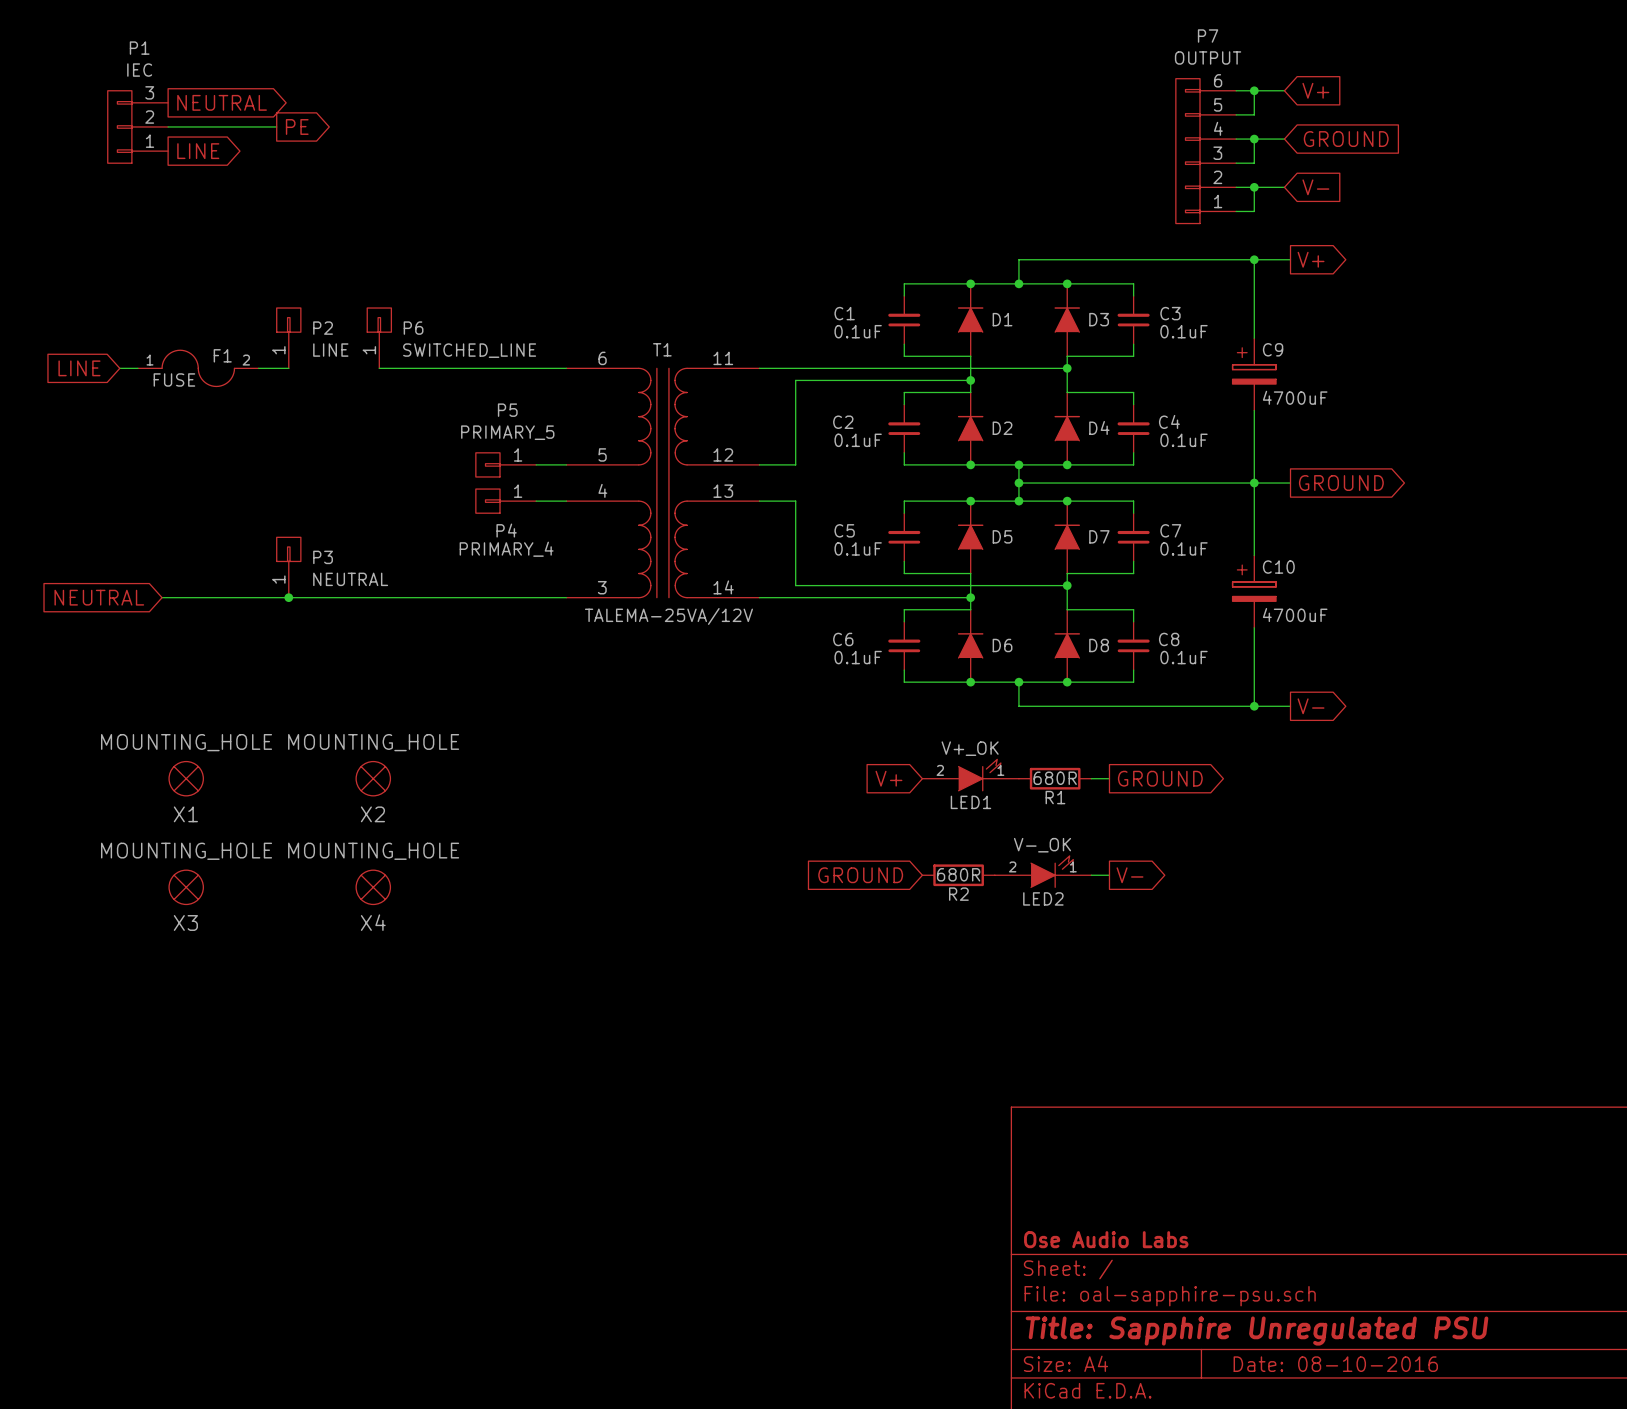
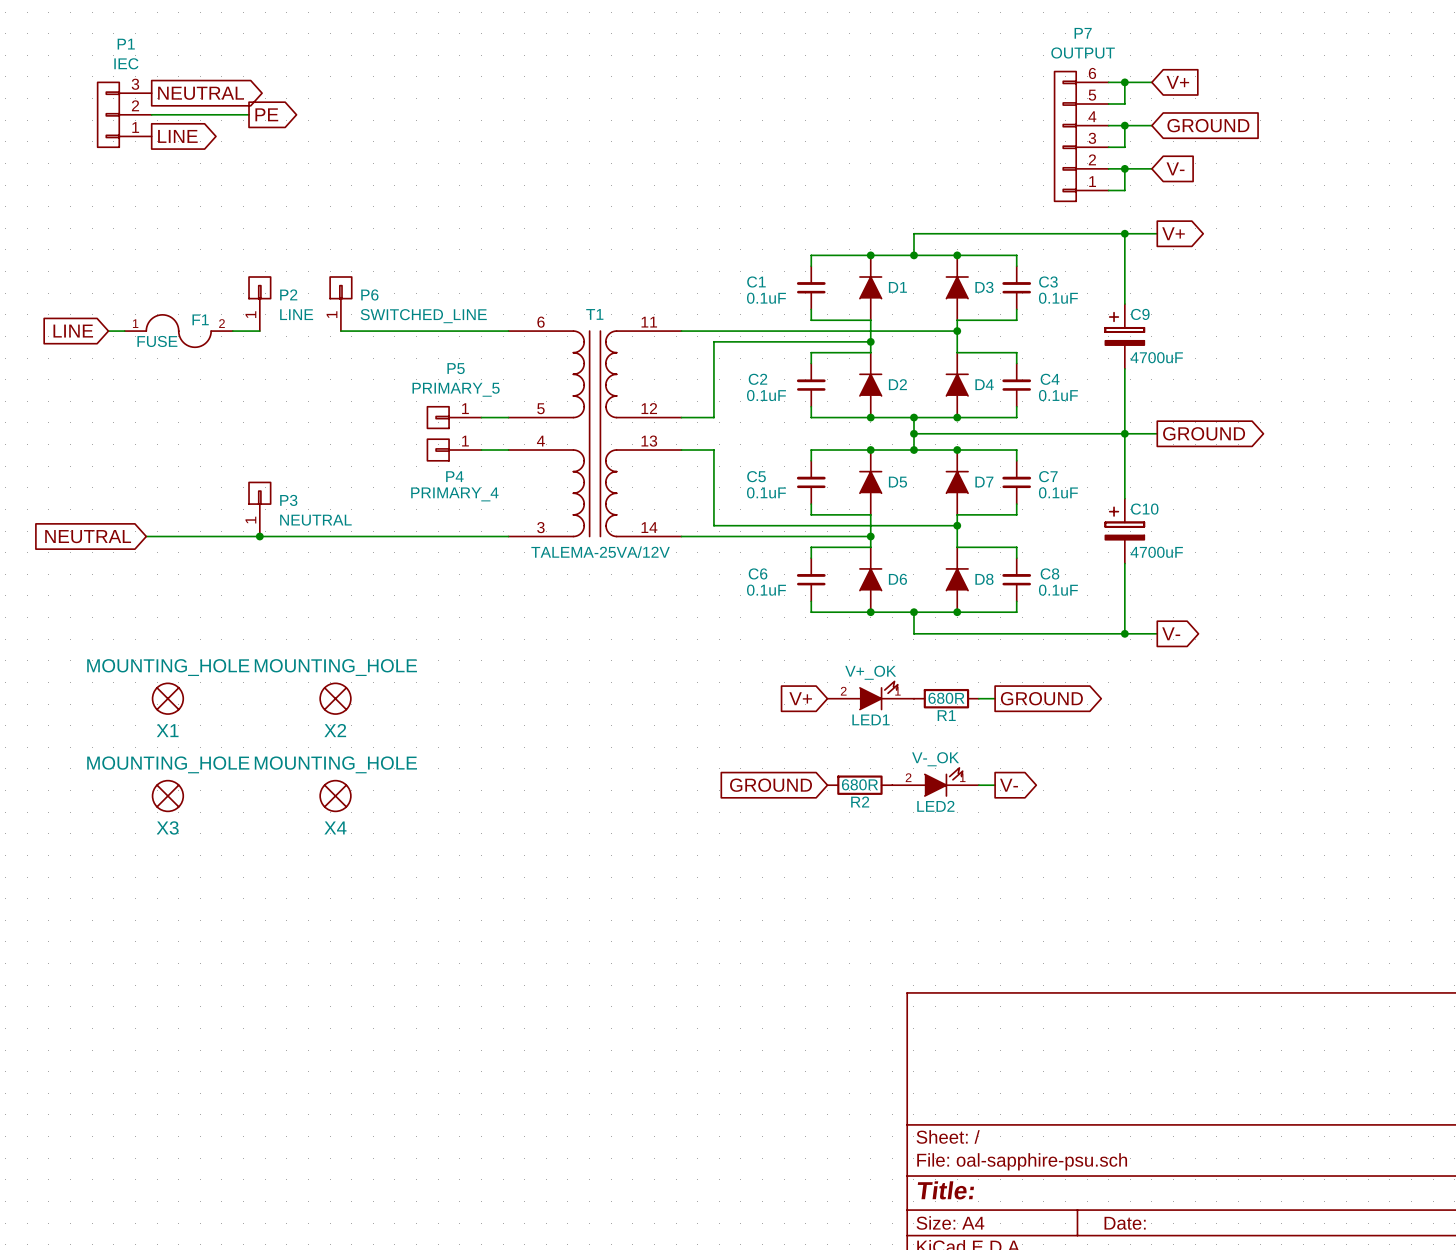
title block: Ose Audio Labs (1106, 1239) -> none
title block: Title: Sapphire Unregulated PSU (1257, 1331) -> Title: (945, 1190)
title block: Date: 08-10-2016 (1335, 1364) -> Date: (1125, 1223)

